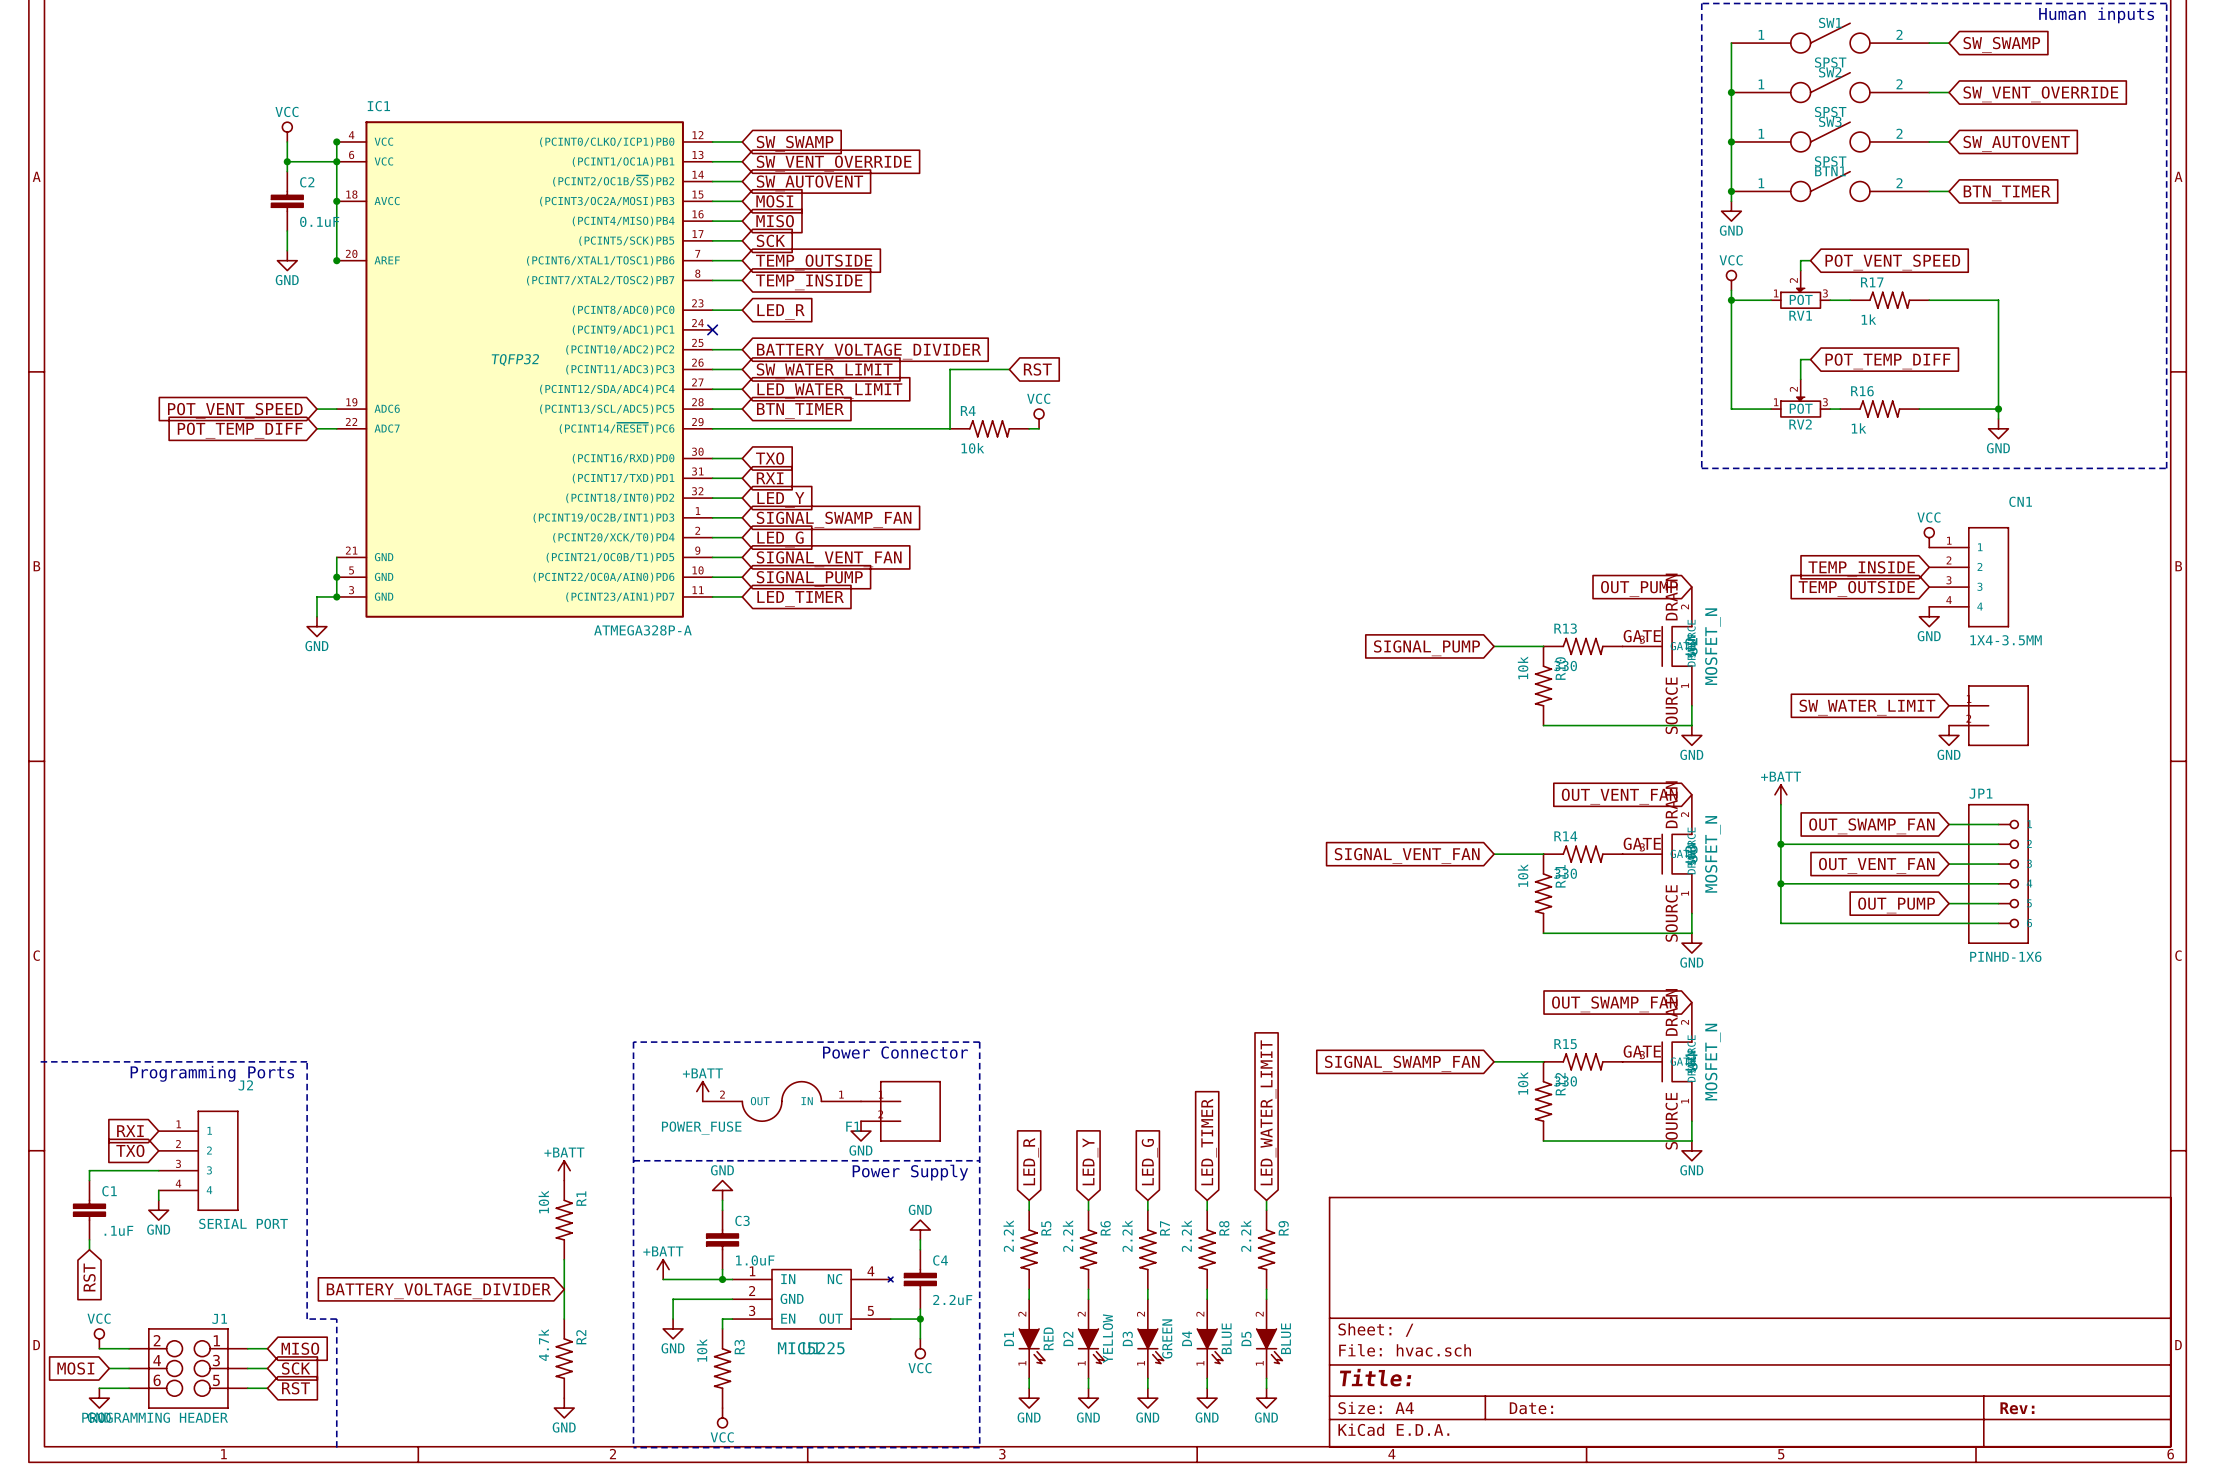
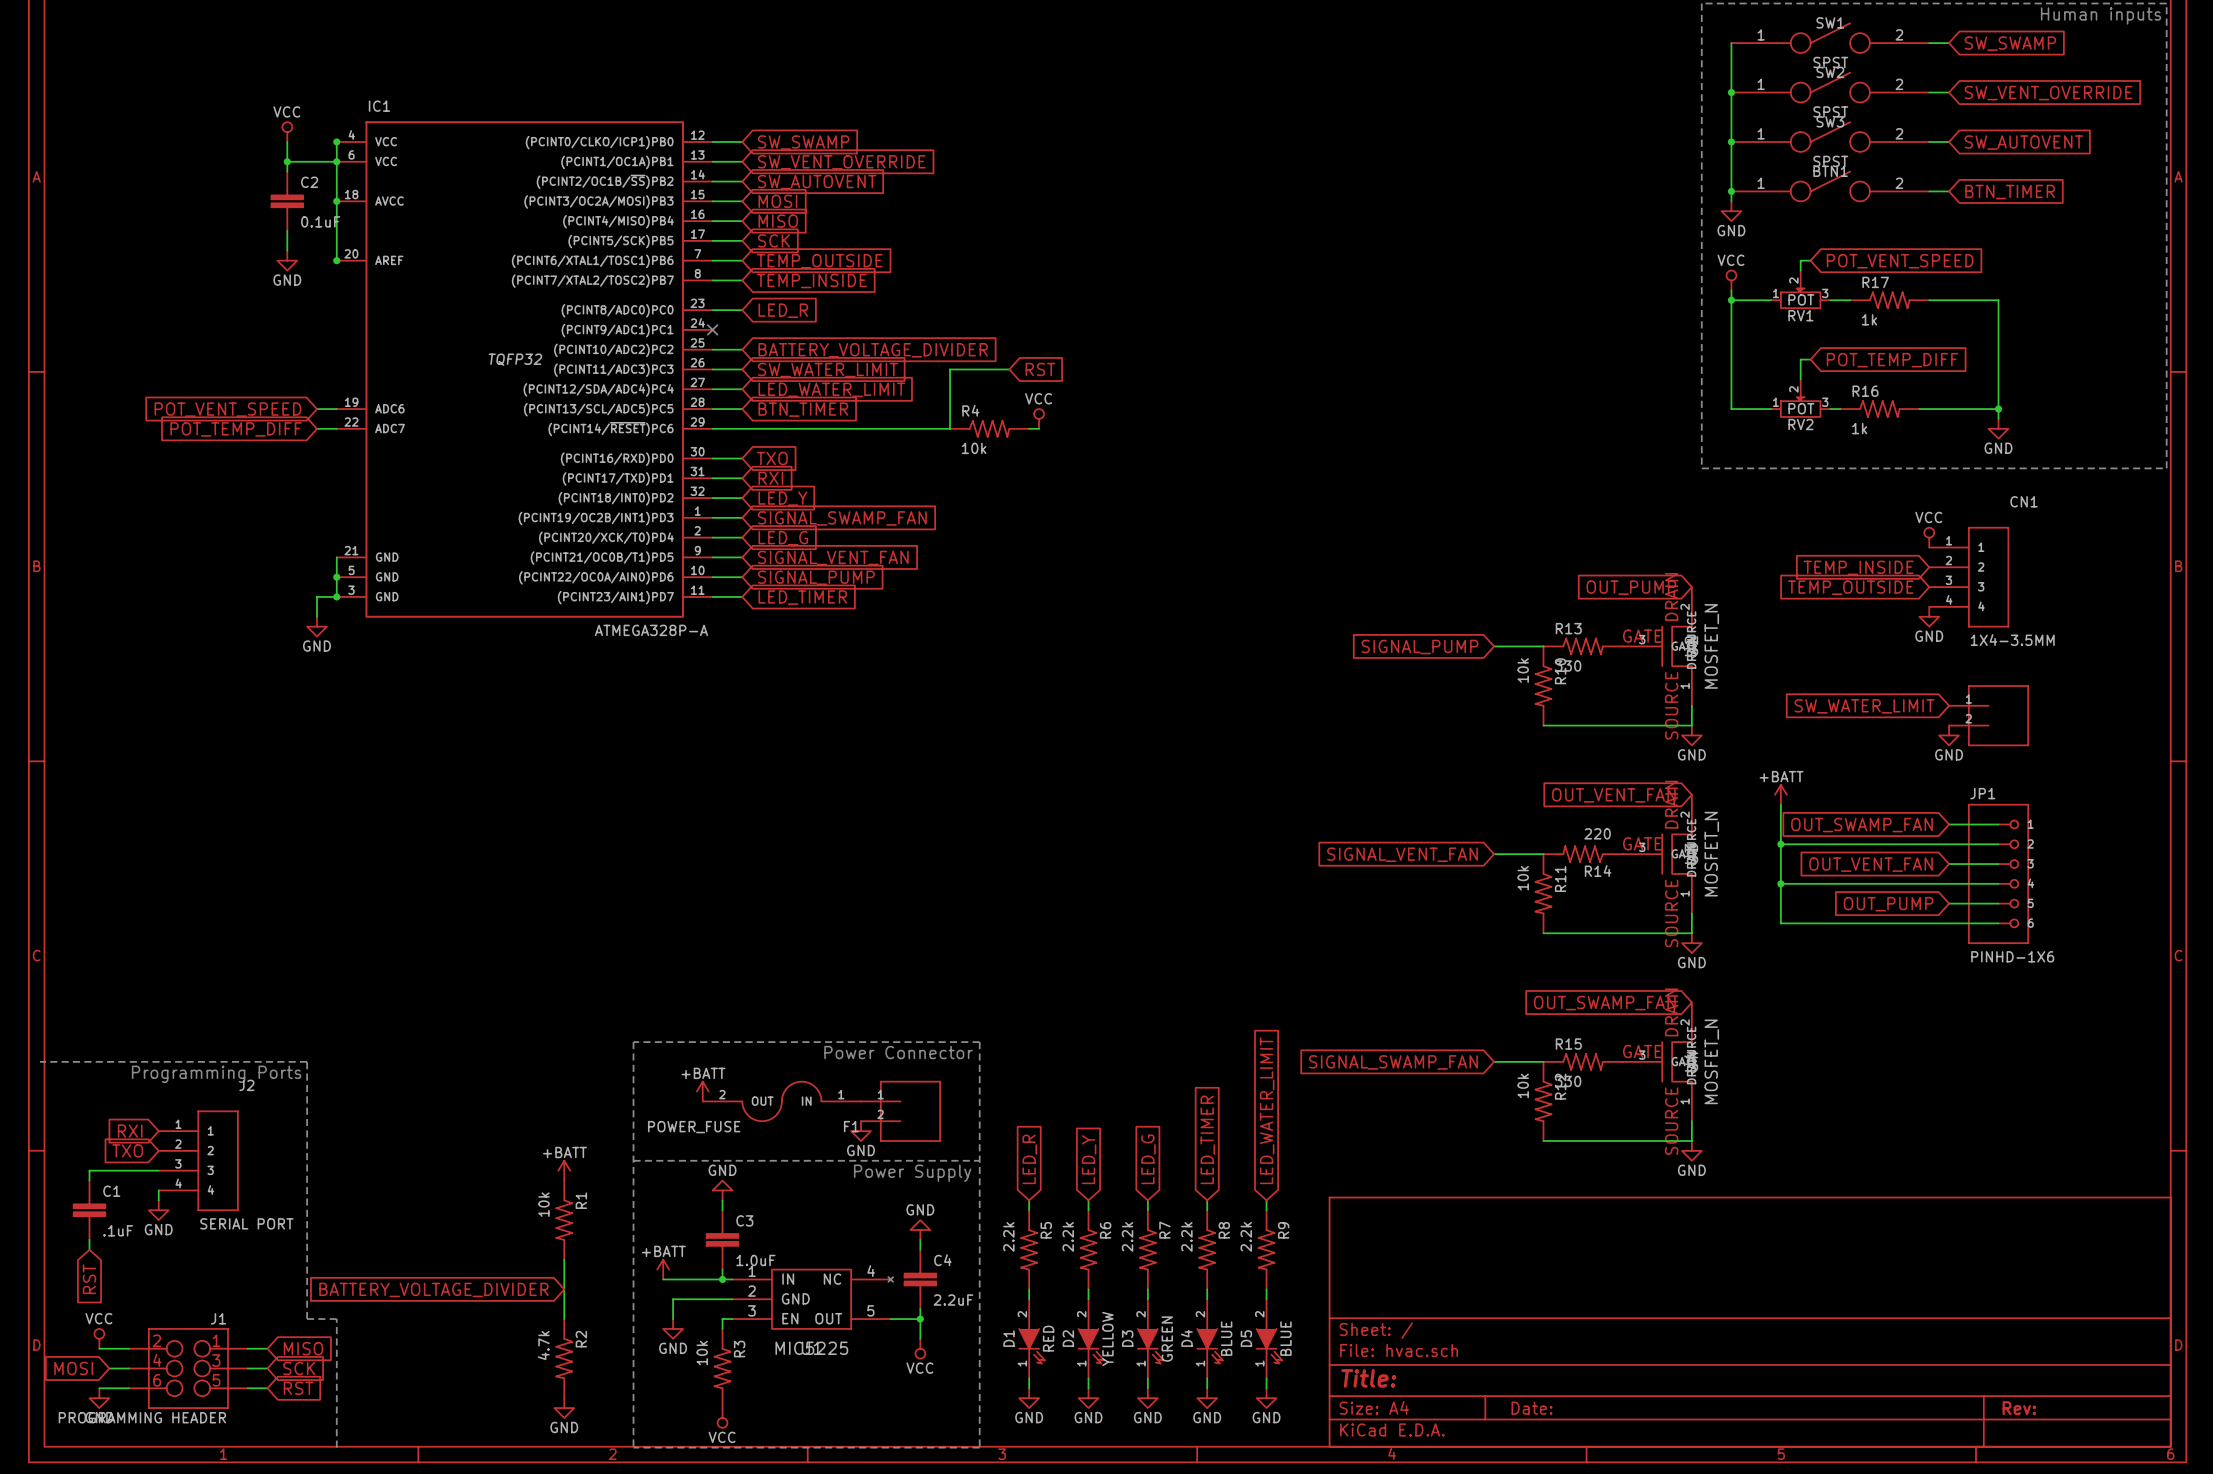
R14 rotation: 0° (1583, 854) -> 180° (1583, 854)
R14 value: 330 (1565, 873) -> 220 (1597, 833)

